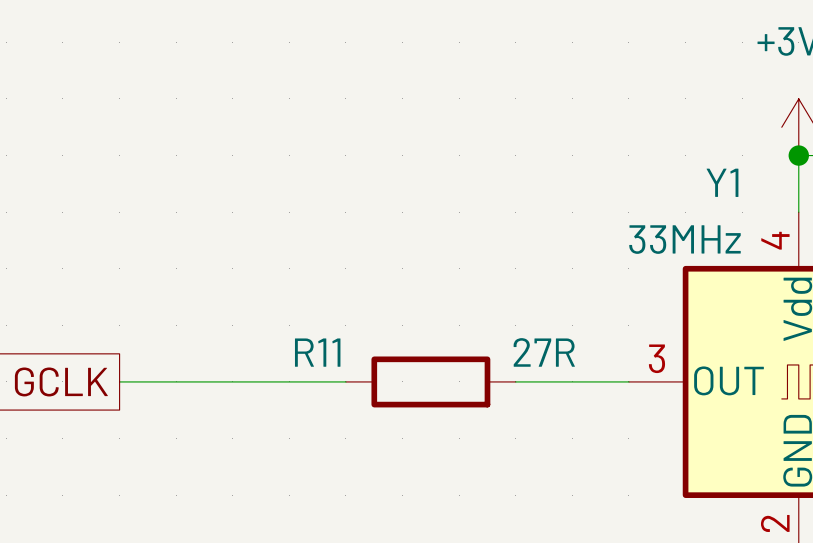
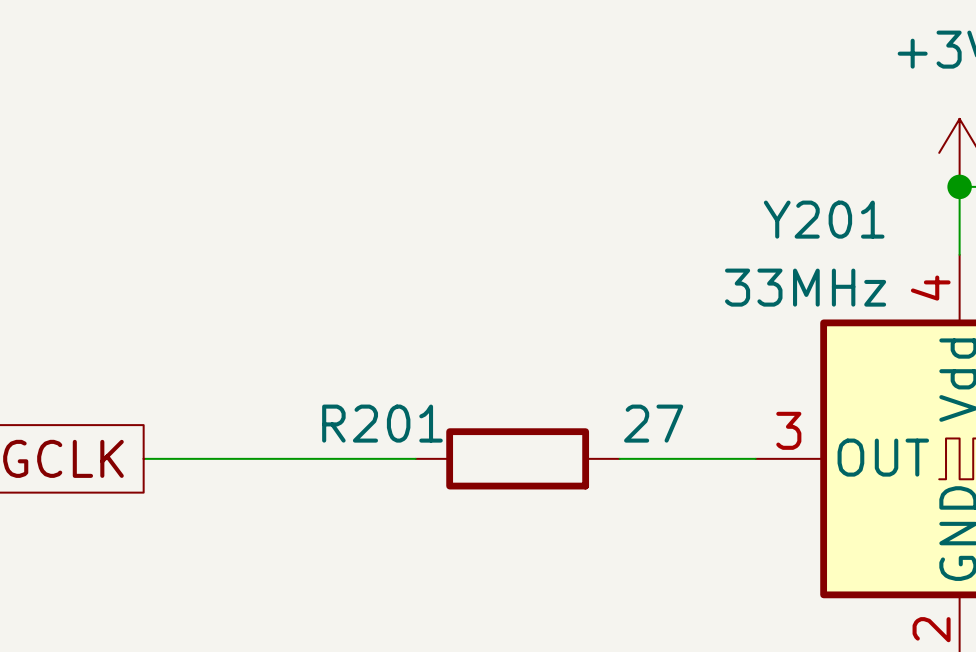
Y1 name: Y1 (722, 182) -> Y201 (824, 219)
R11 name: R11 (317, 352) -> R201 (382, 423)
R11 value: 27R (544, 352) -> 27 (653, 423)

